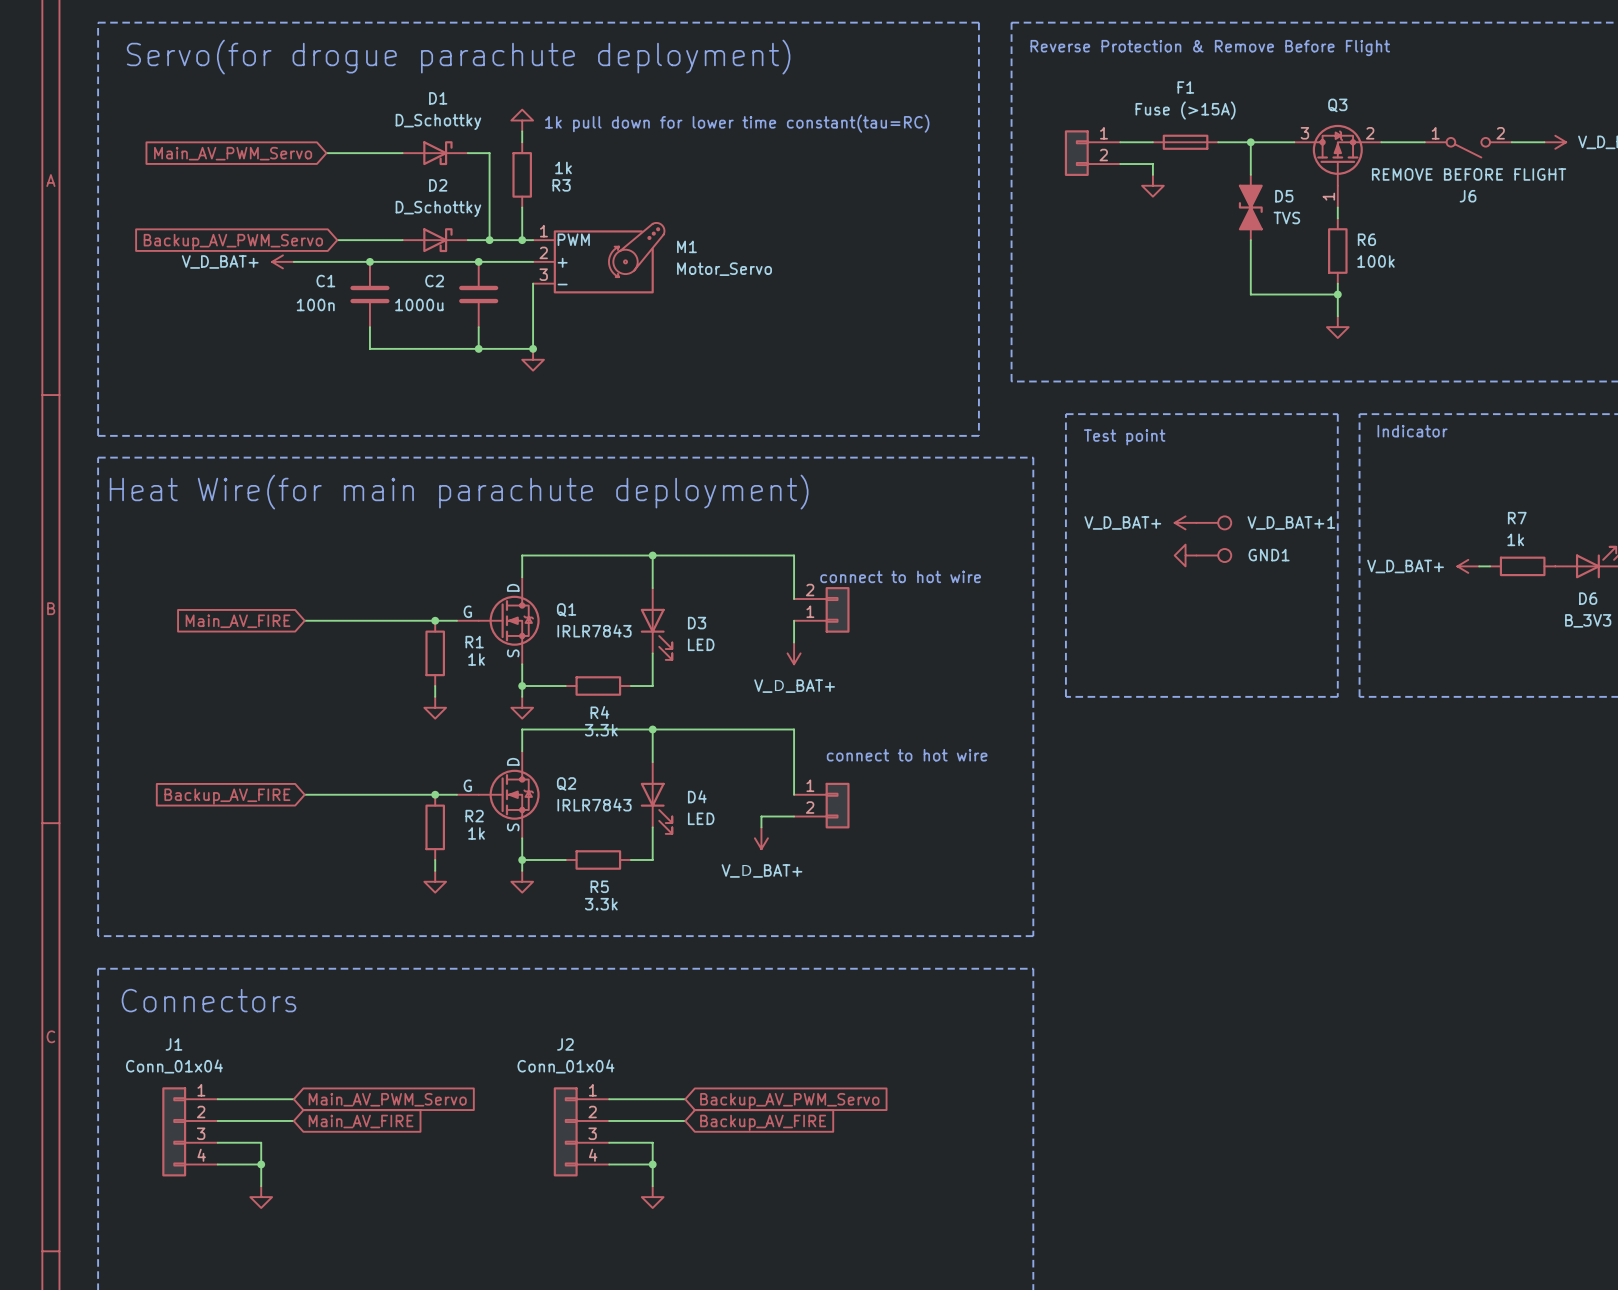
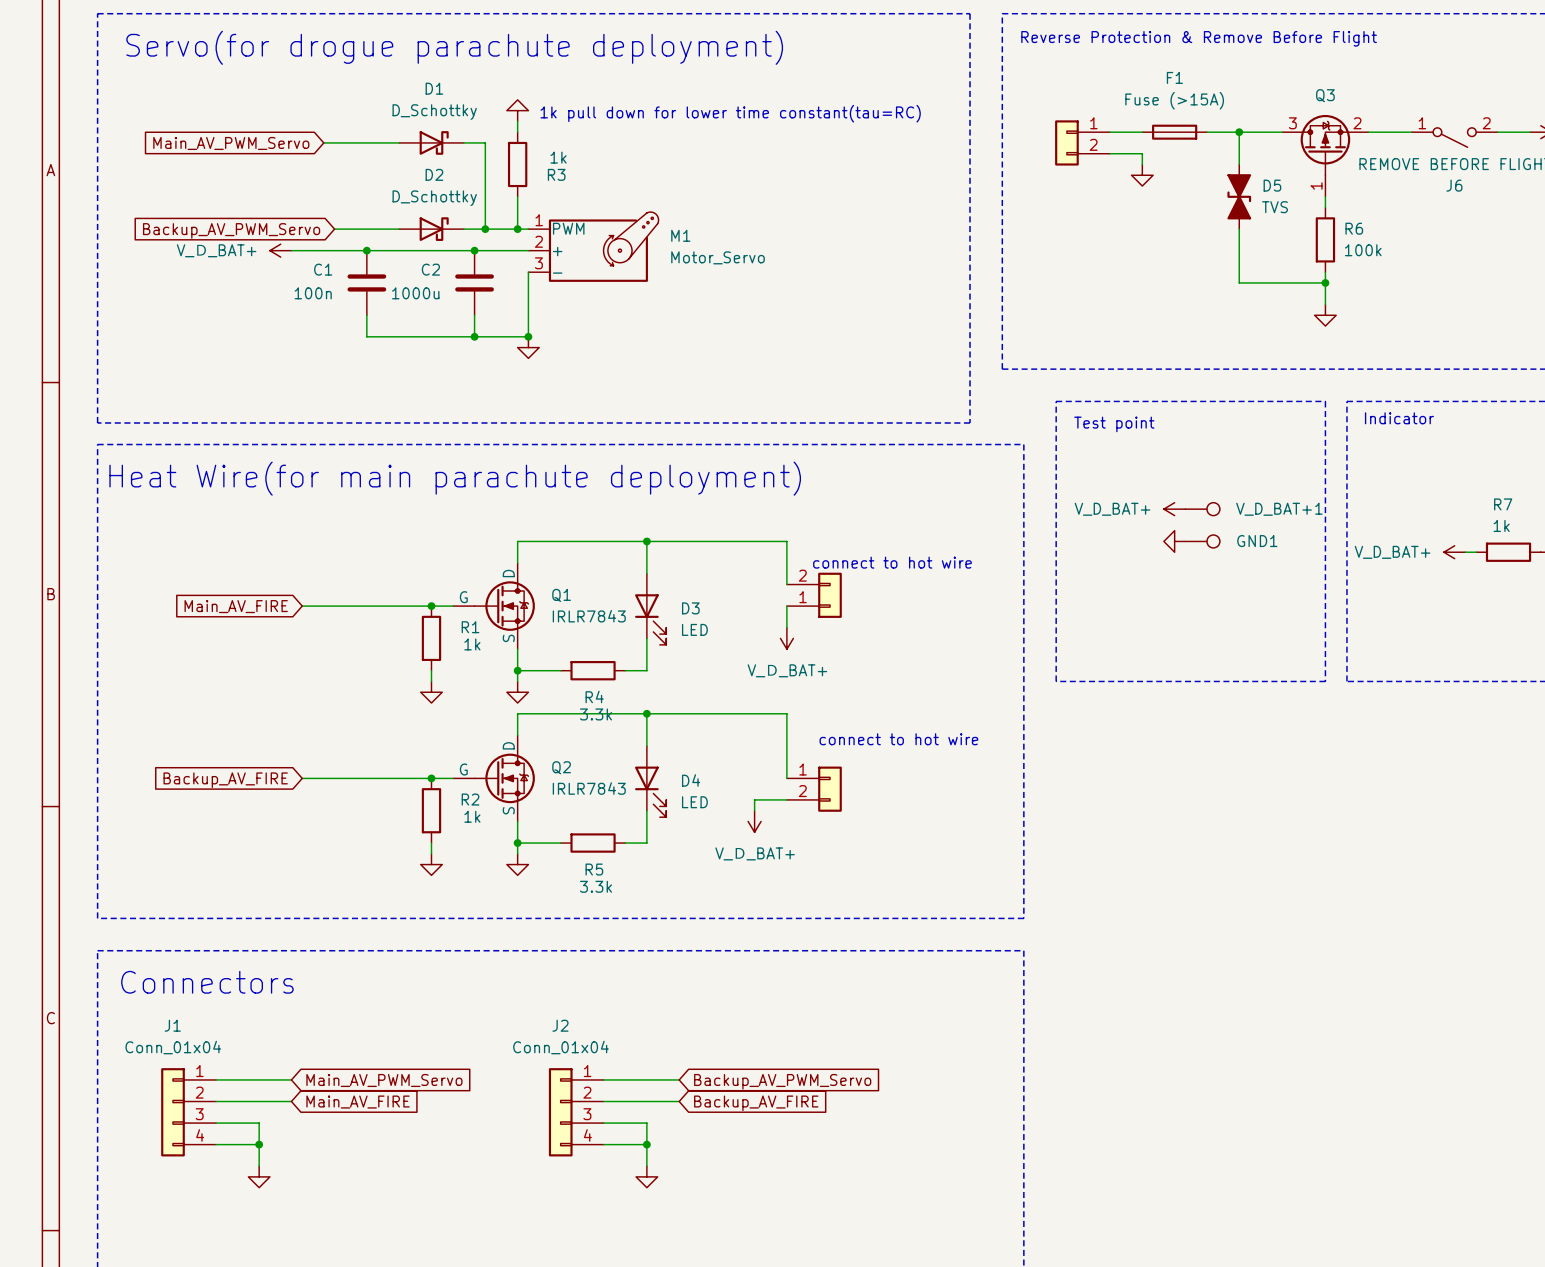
power symbol: V_D_BAT+ (282, 261) -> V_Ｄ_BAT+ (280, 250)

